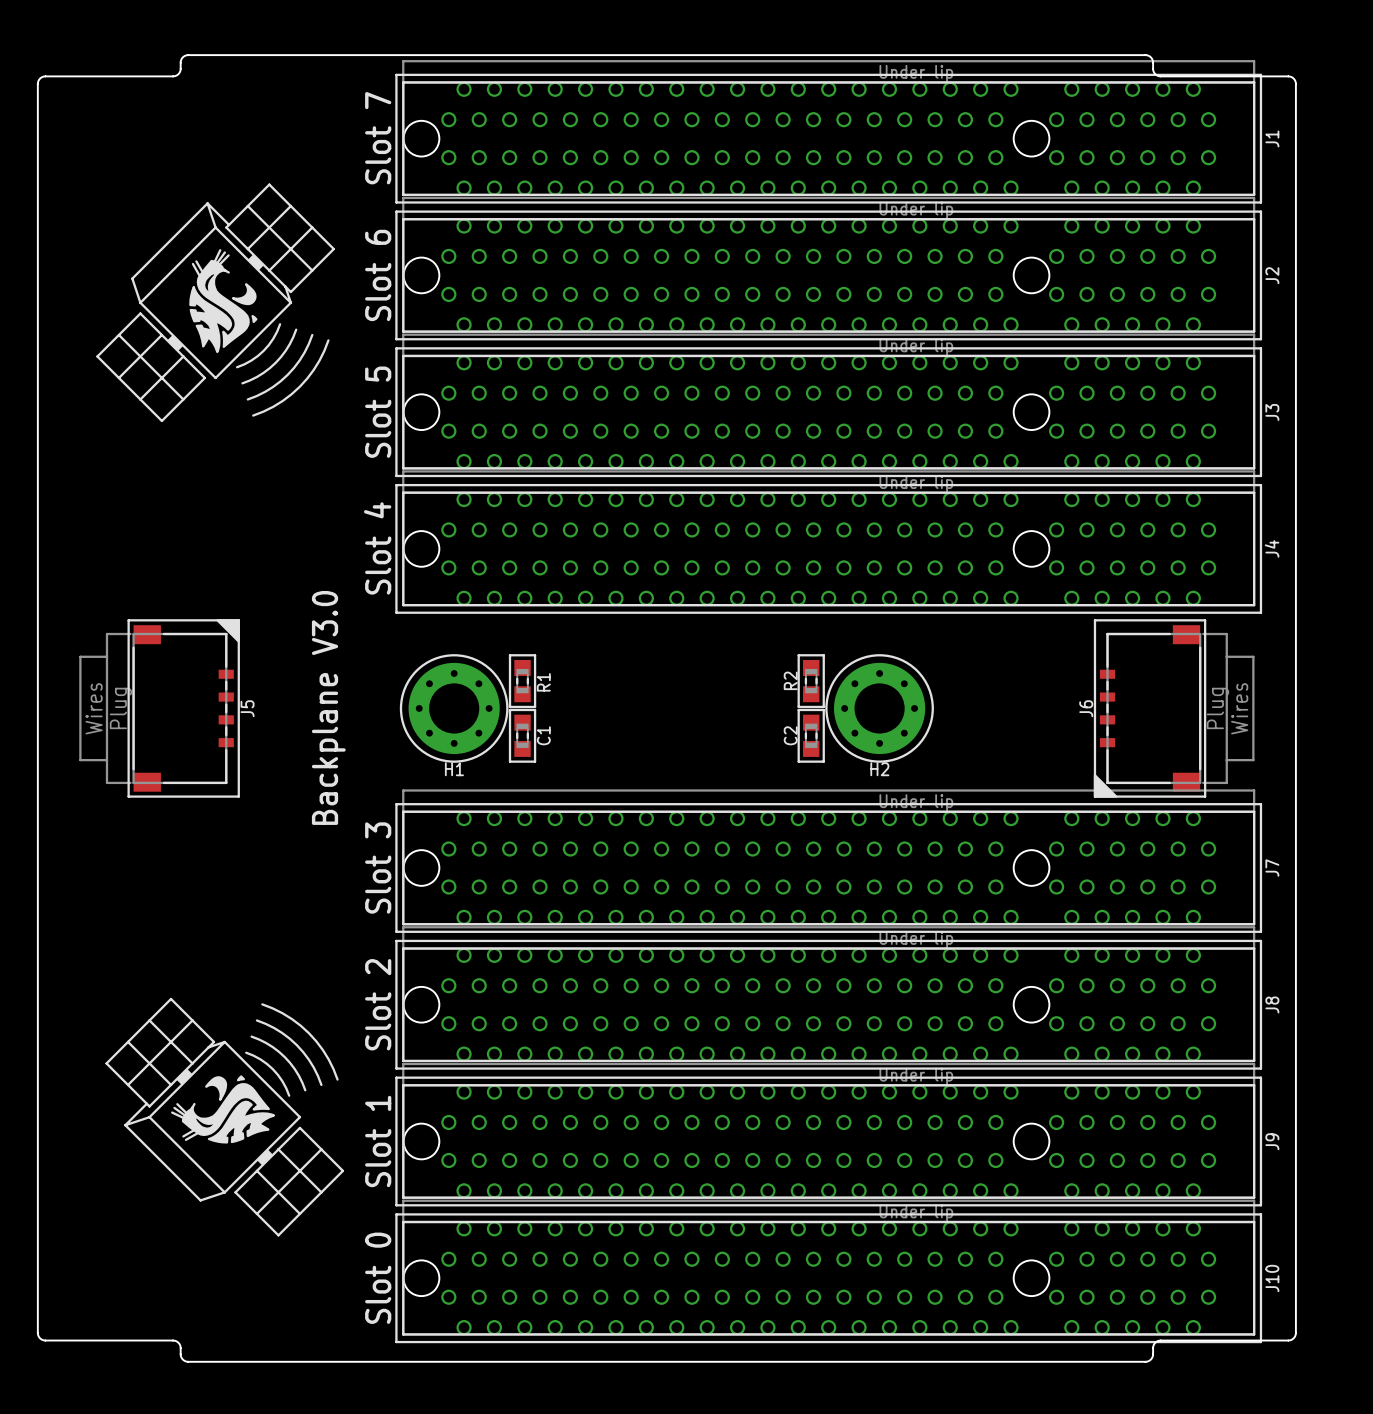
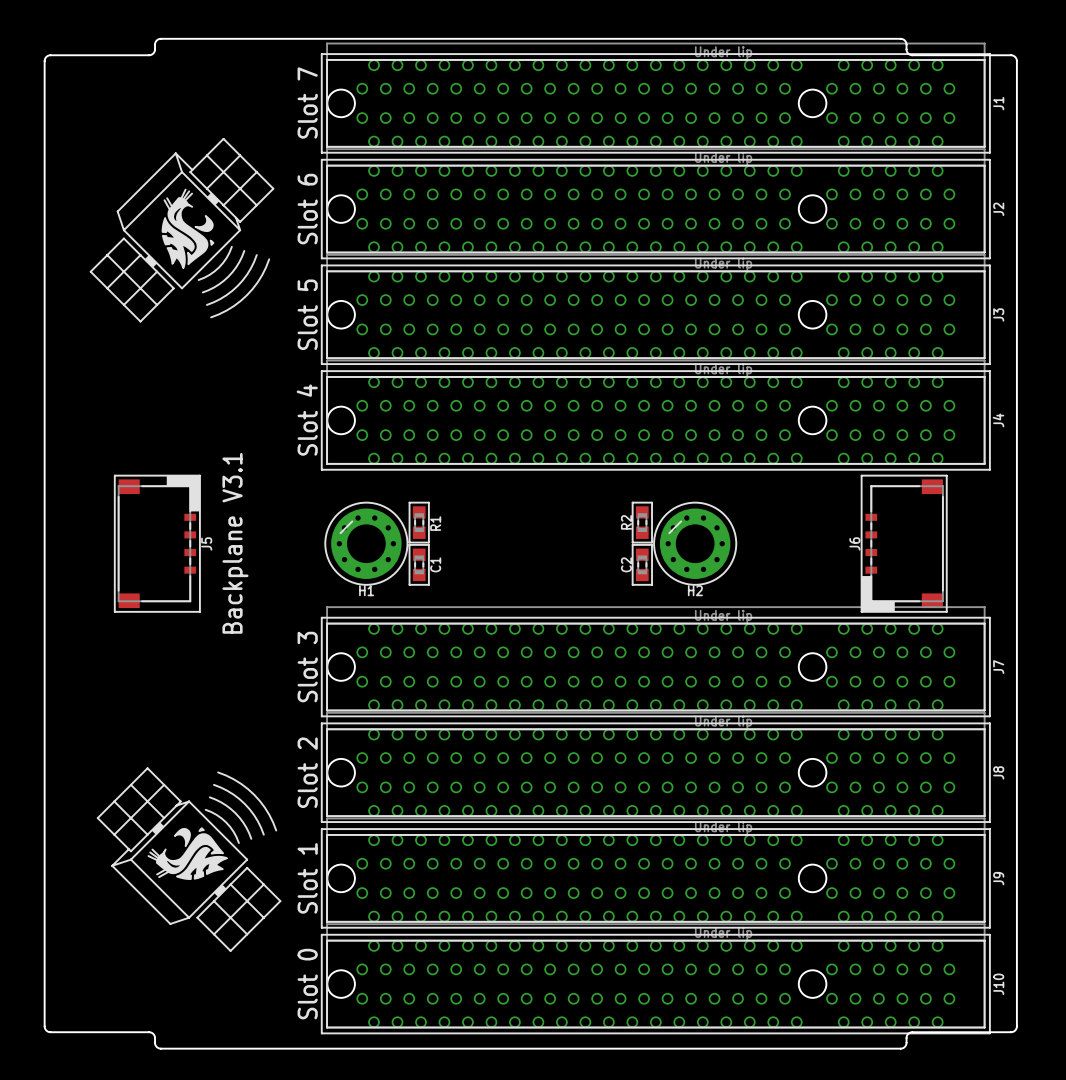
J5 footprint: [79, 619, 240, 798] -> [113, 474, 201, 613]
J6 footprint: [1093, 619, 1255, 798] -> [860, 474, 948, 613]
H1 footprint: [399, 654, 509, 763] -> [324, 501, 409, 586]
H2 footprint: [825, 654, 934, 763] -> [653, 501, 738, 586]
text: Backplane V3.0 (328, 707) -> Backplane V3.1 (235, 543)

